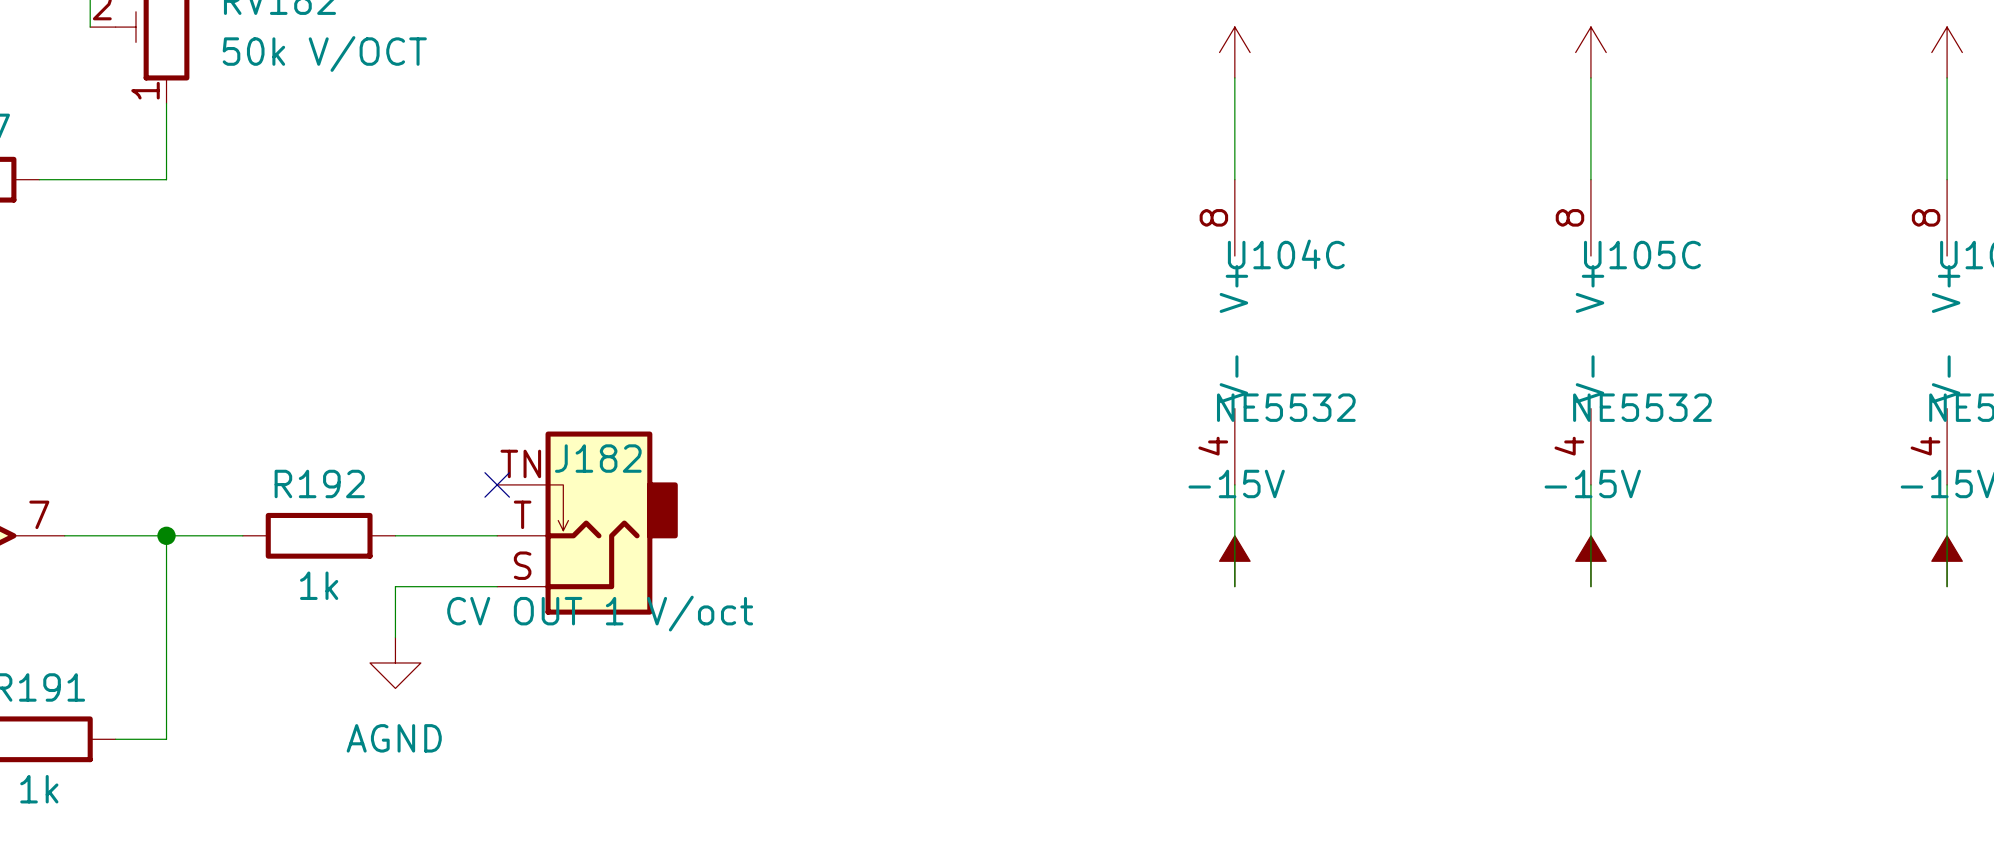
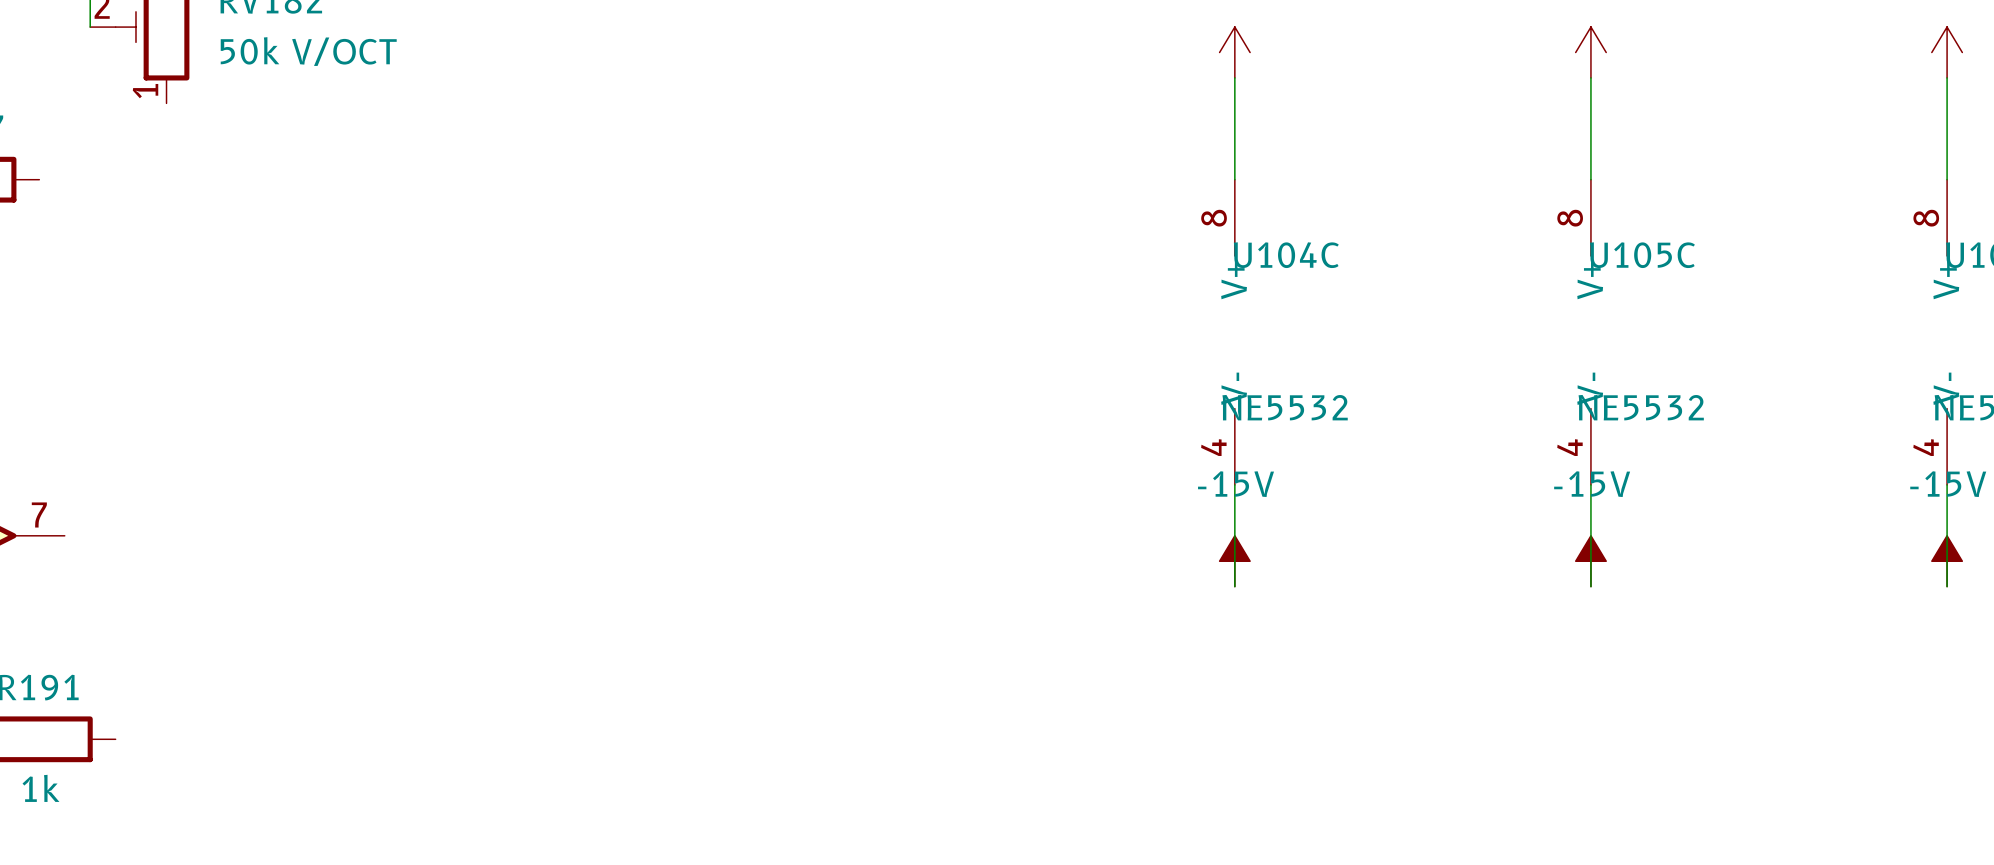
wire: (166, 103) (166, 179) (39, 179) -> none
no-connect mark: (497, 484) -> none
J182: CV OUT 1 V/oct (587, 523) -> none
wire: (64, 535) (242, 535) -> none
wire: (166, 535) (166, 739) (115, 739) -> none
junction: (166, 535) -> none
R192: 1k (319, 535) -> none
wire: (395, 535) (497, 535) -> none
wire: (497, 586) (395, 586) (395, 637) -> none
power symbol: AGND (395, 662) -> none

